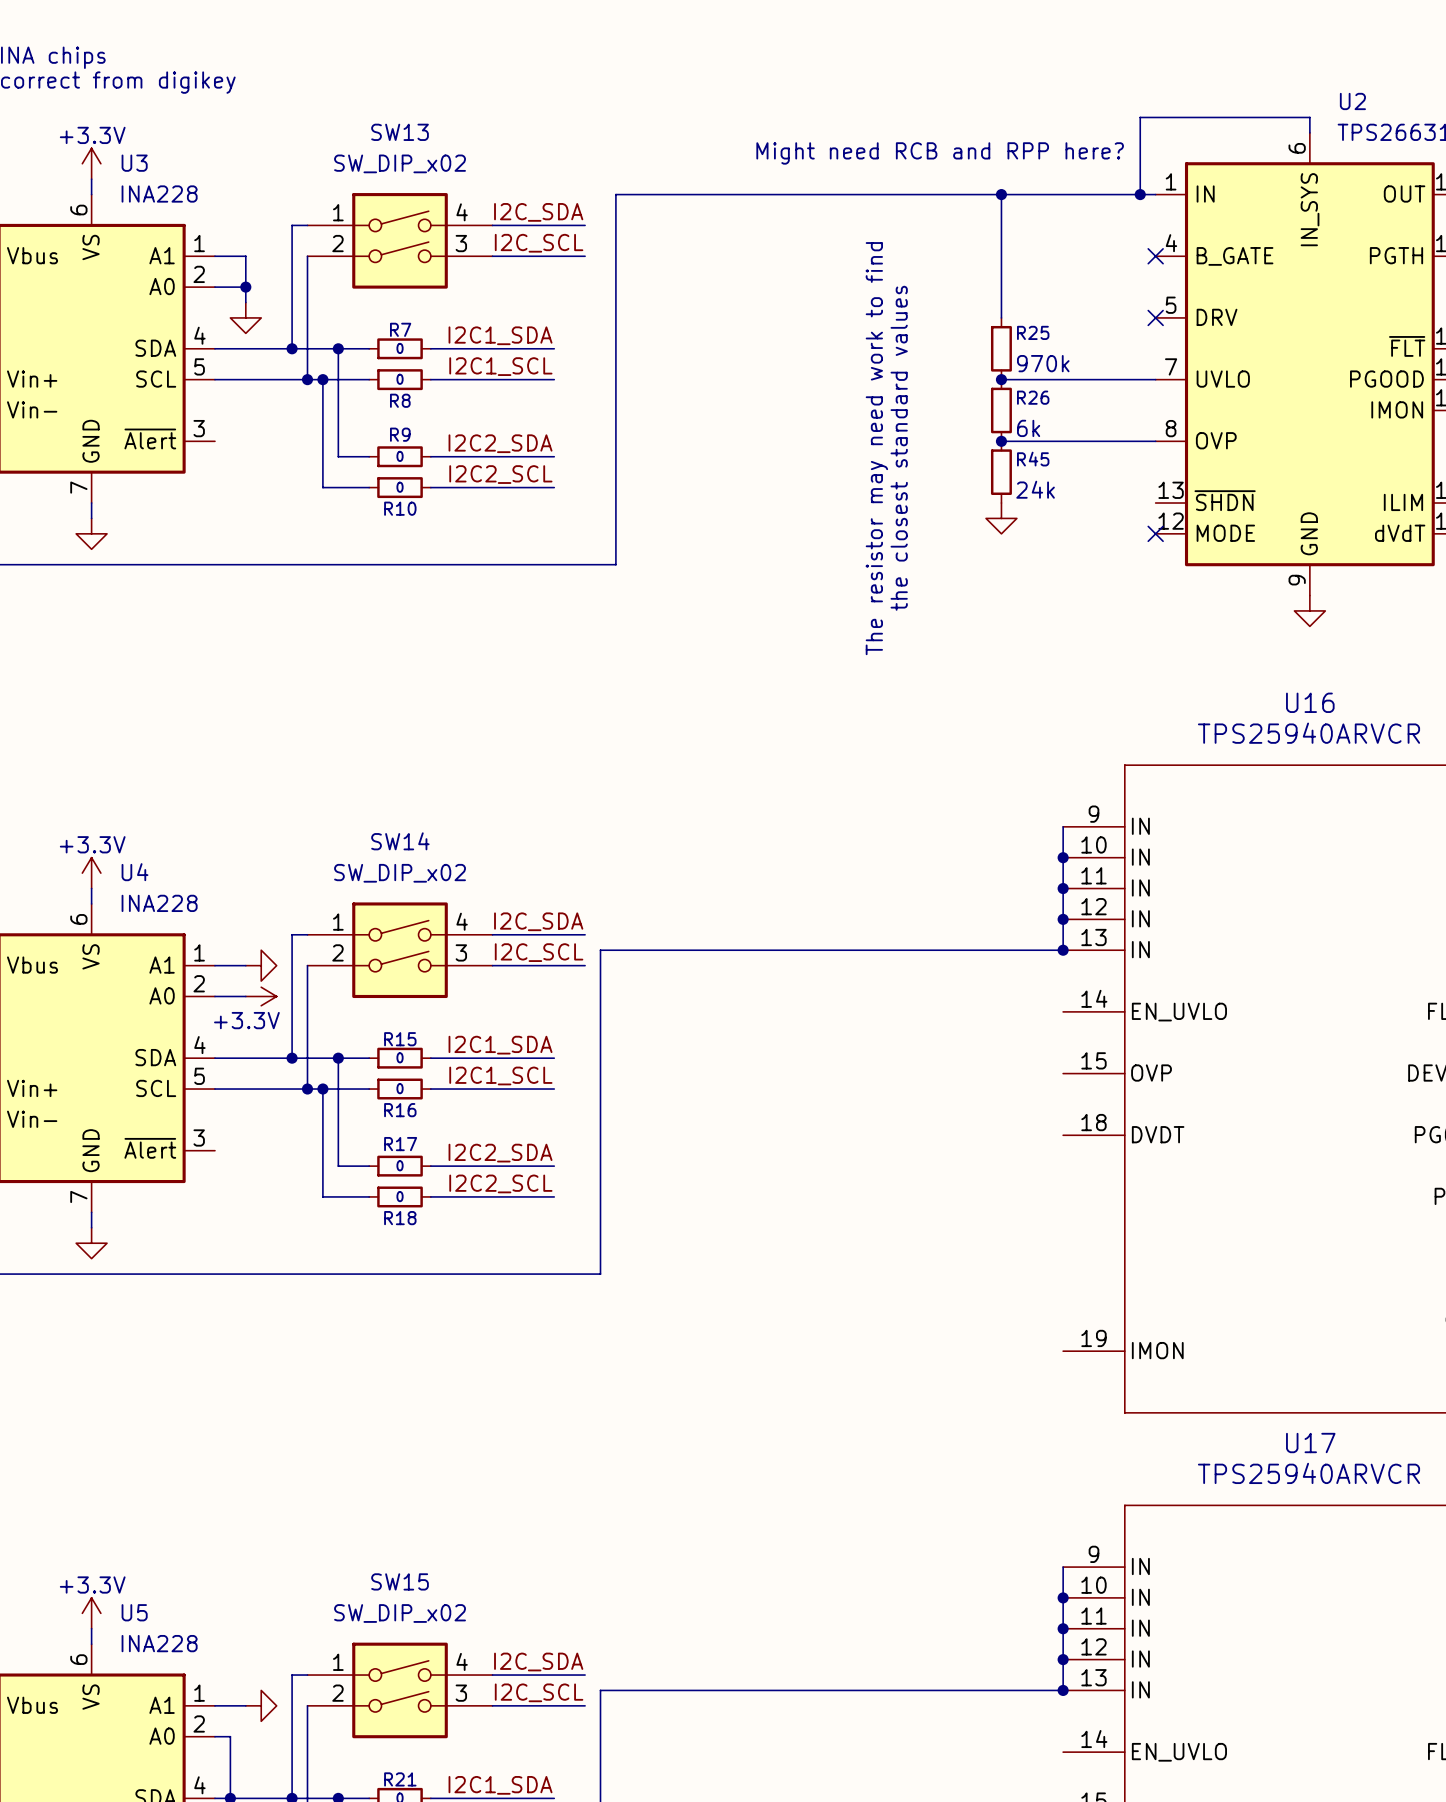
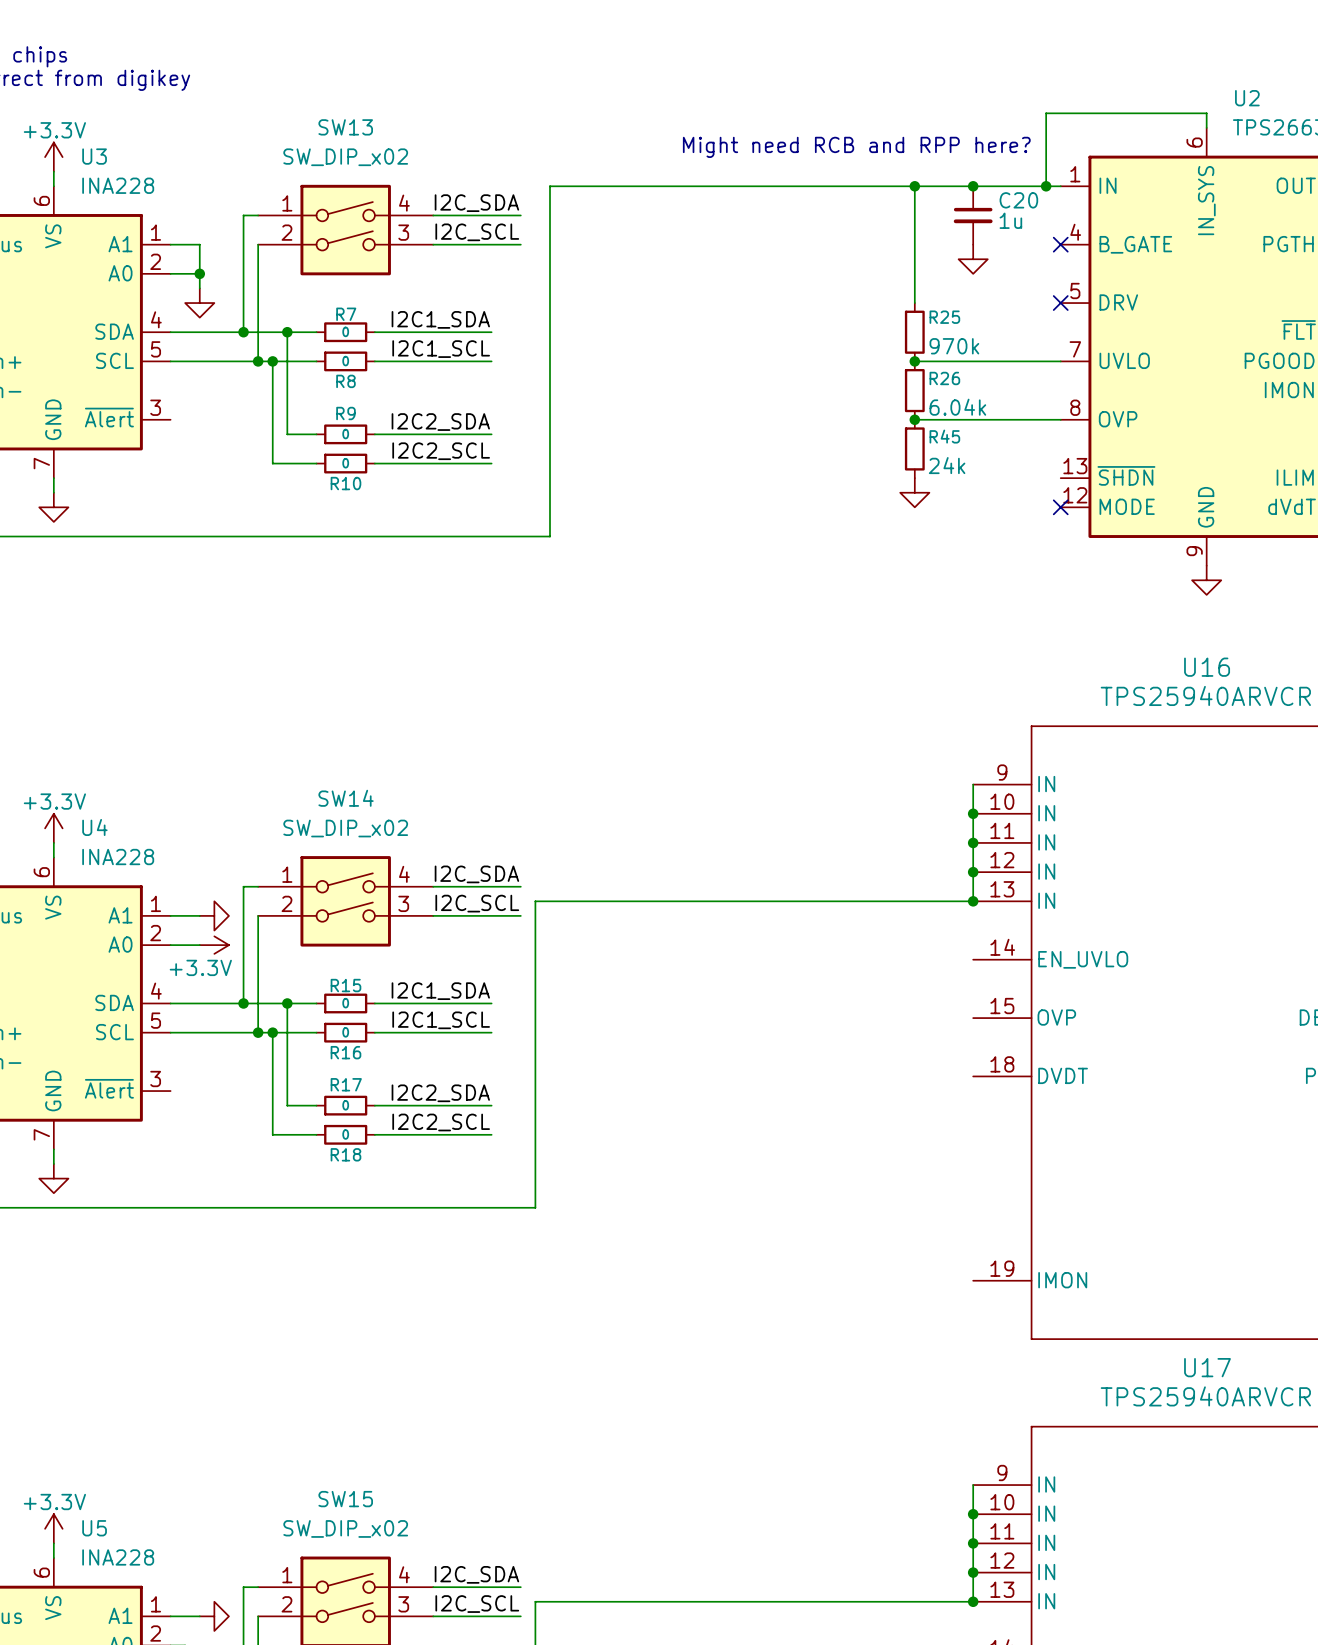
junction: none -> (973, 186)
C20: none -> 1u (973, 215)
power symbol: none -> (973, 259)
R26 value: 6k (1028, 428) -> 6.04k (957, 407)
text: The resistor may need work to find (876, 448) -> none
text: the closest standard values (899, 448) -> none

